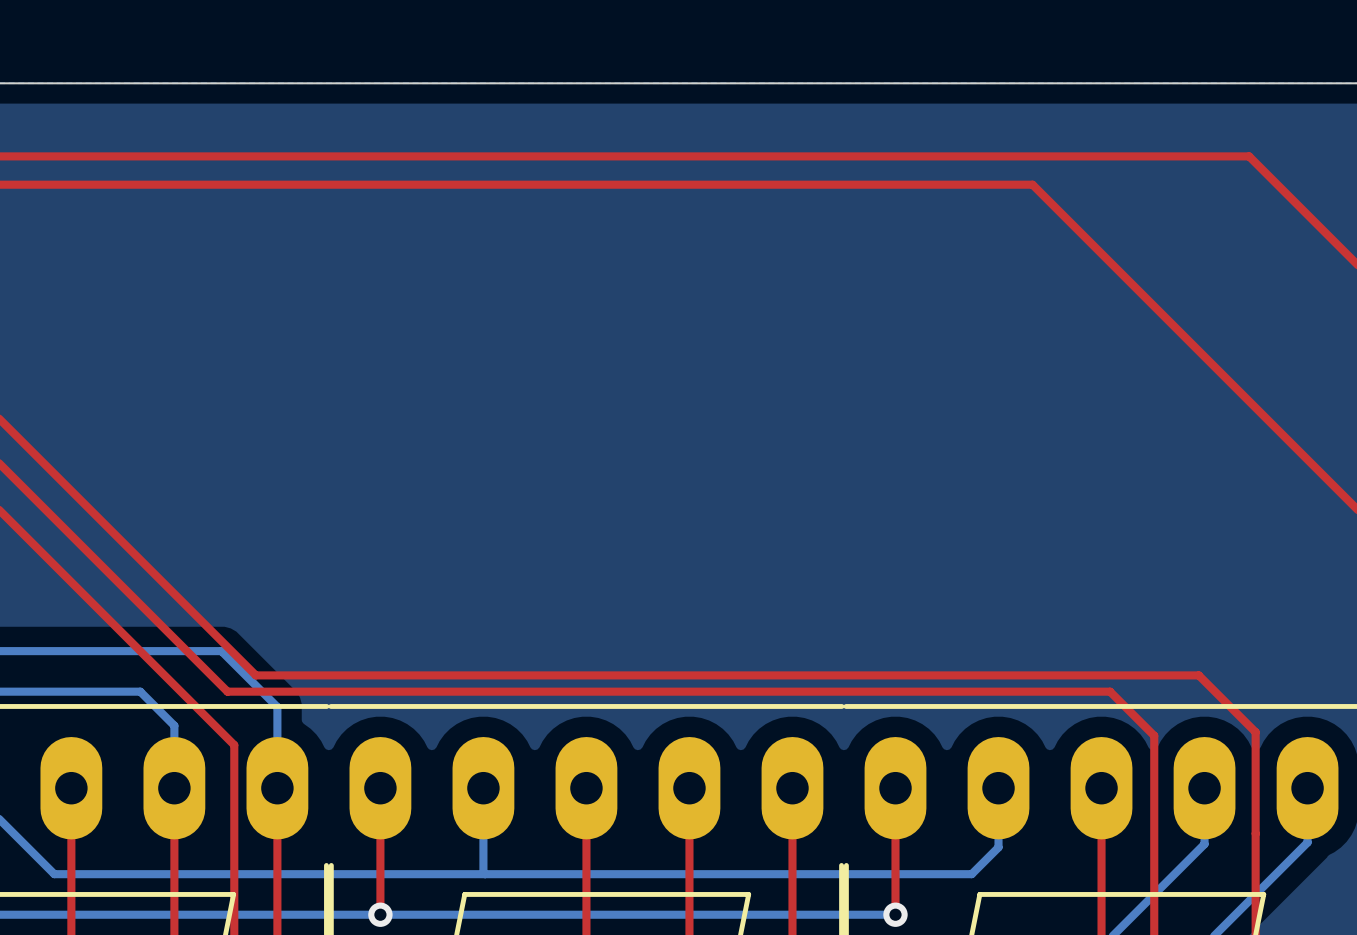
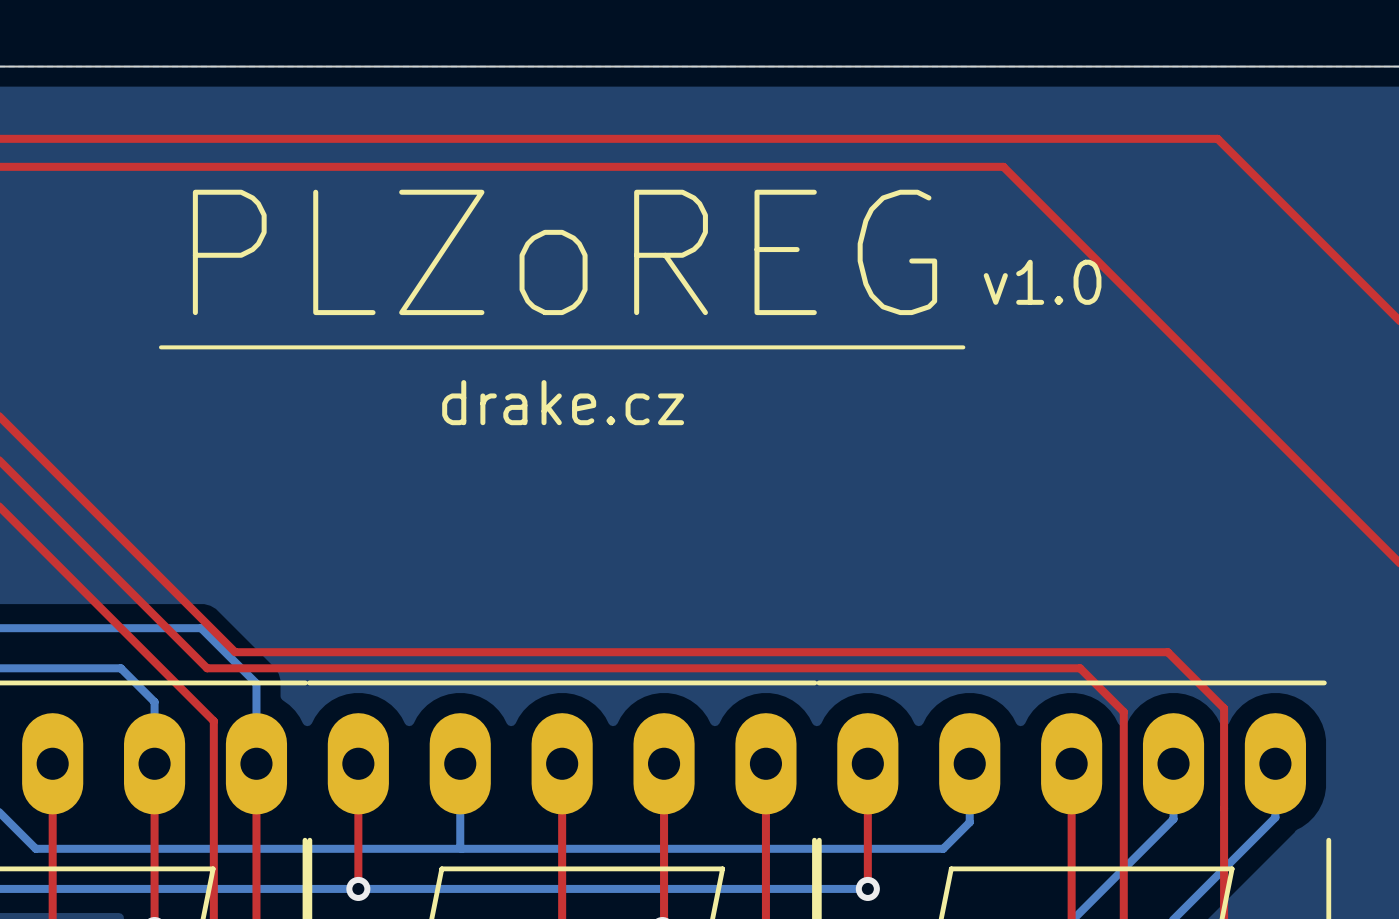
text: none -> PLZoREG (565, 252)
text: none -> v1.0 (1042, 282)
line: none -> (160, 347) (963, 347)
text: none -> drake.cz (563, 402)

